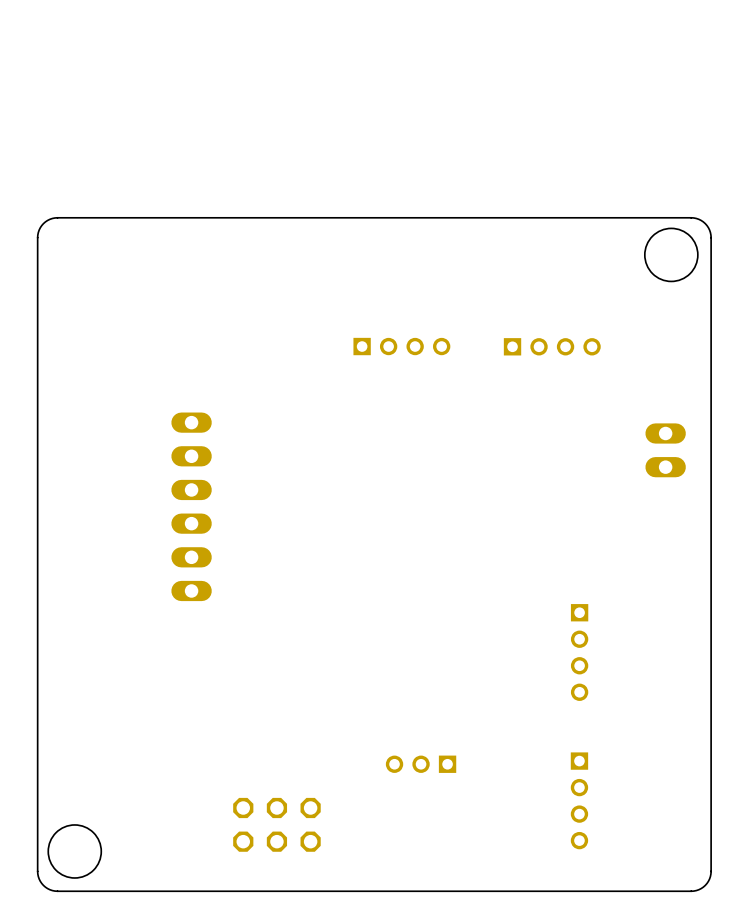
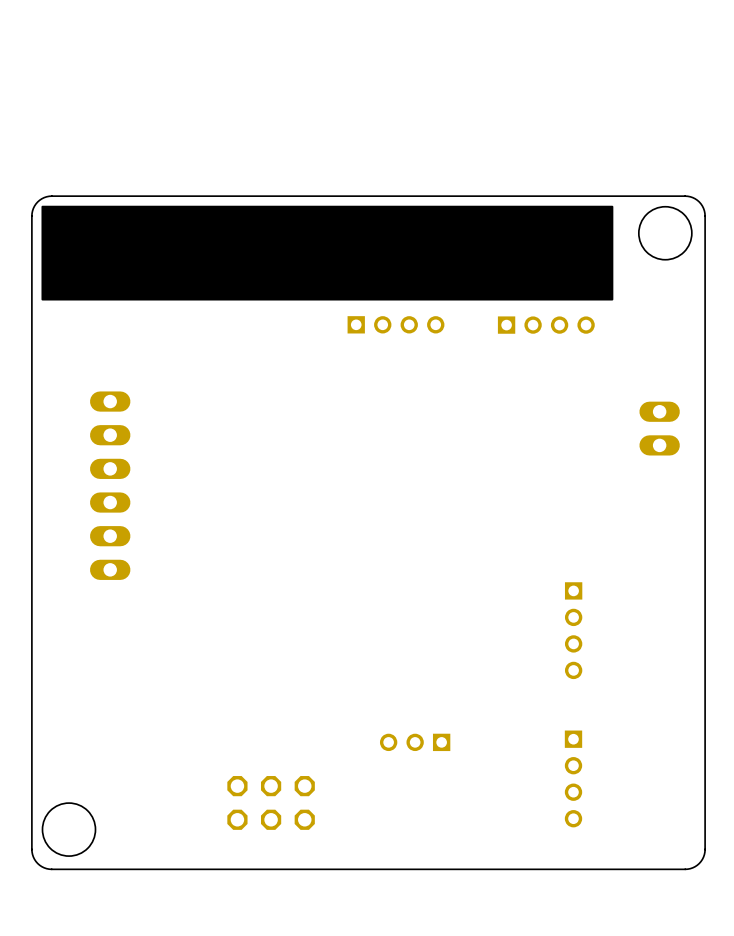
drawing: none -> [41, 205, 614, 301]
part position: (191, 506) -> (110, 485)

